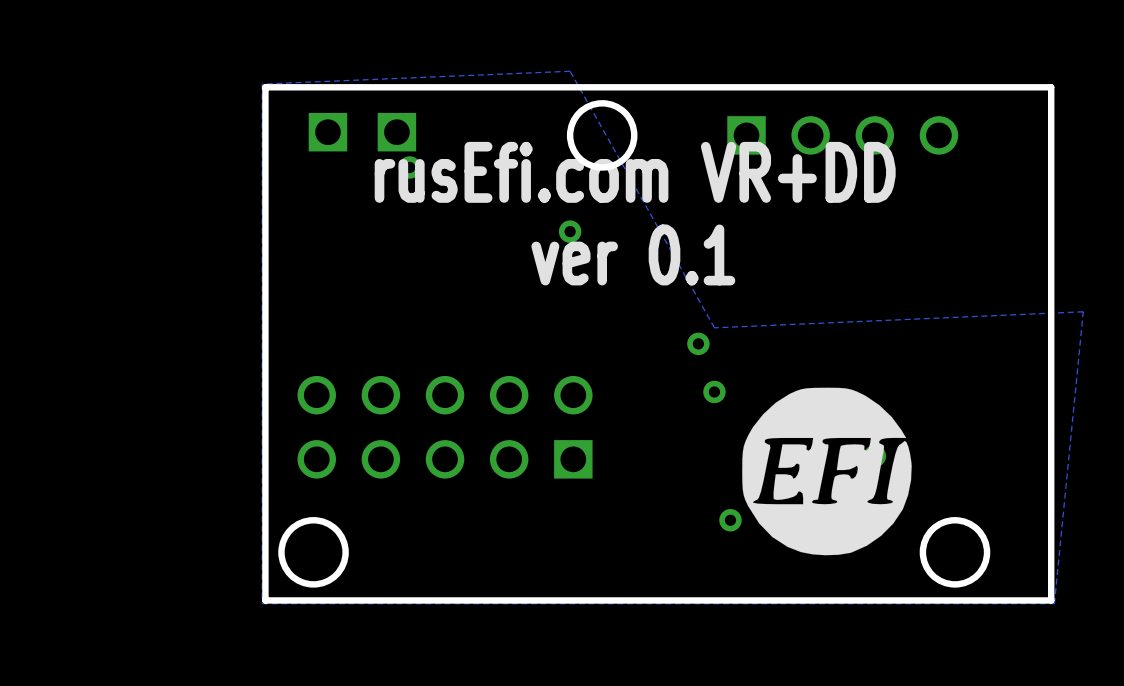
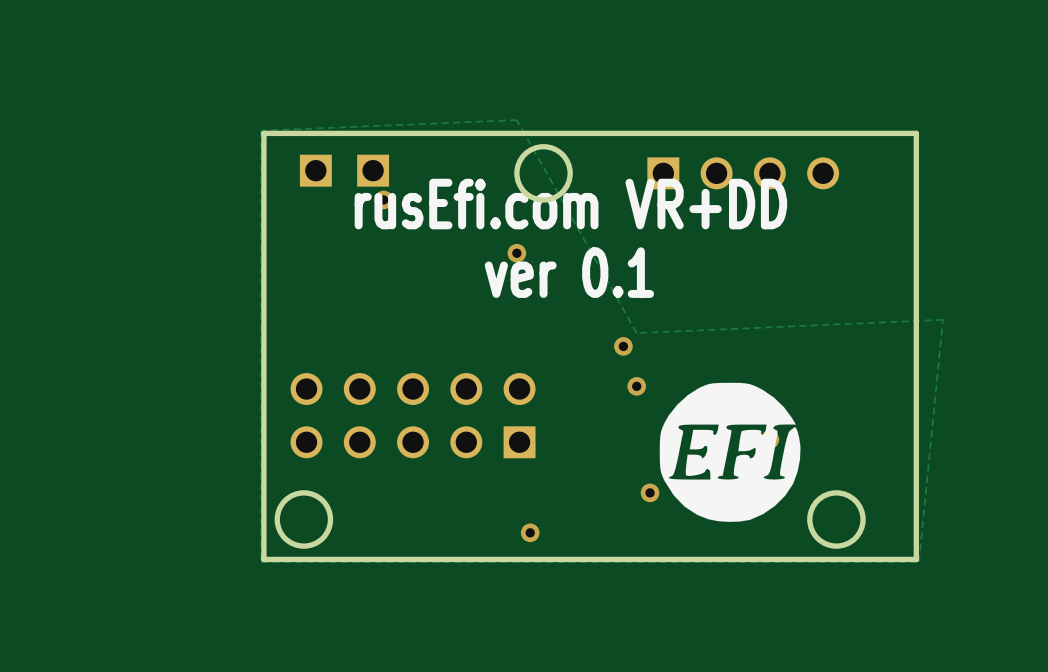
via: none -> (530, 532)

